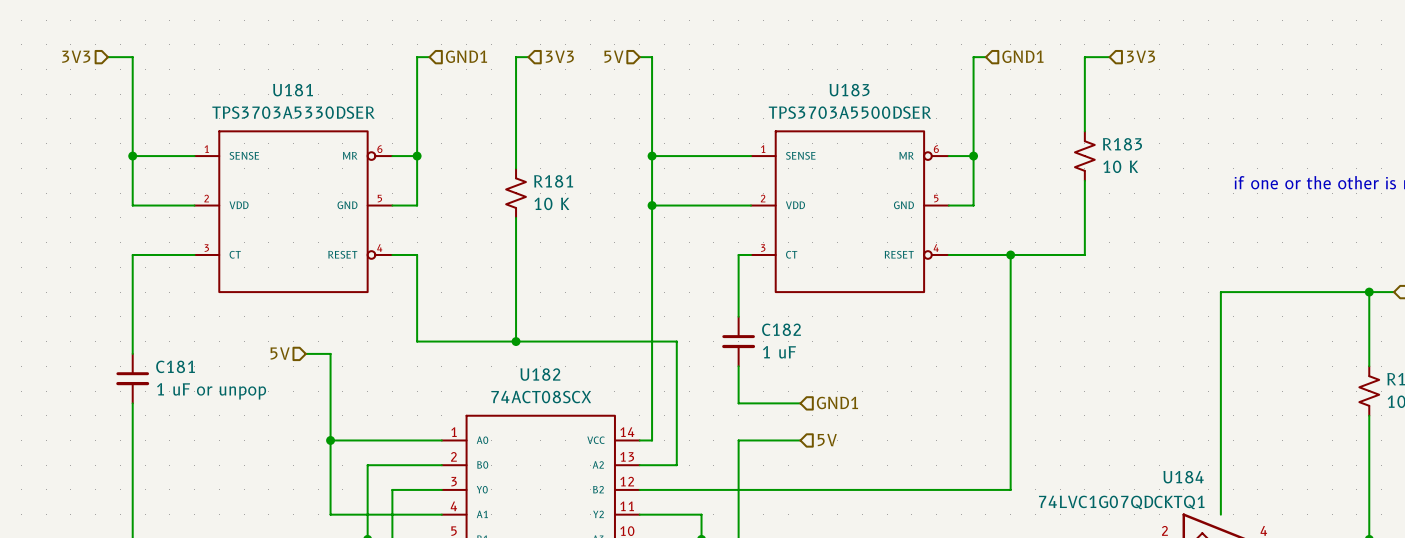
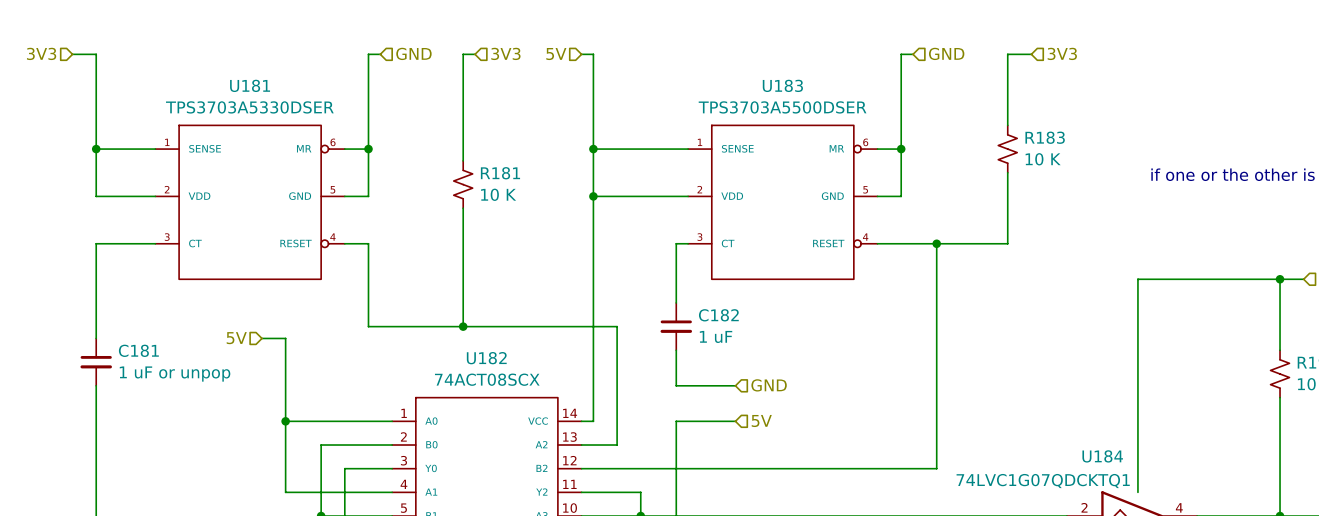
hierarchical label: GND1 (466, 56) -> GND (413, 53)
hierarchical label: GND1 (1022, 56) -> GND (946, 53)
hierarchical label: GND1 (837, 402) -> GND (769, 385)

